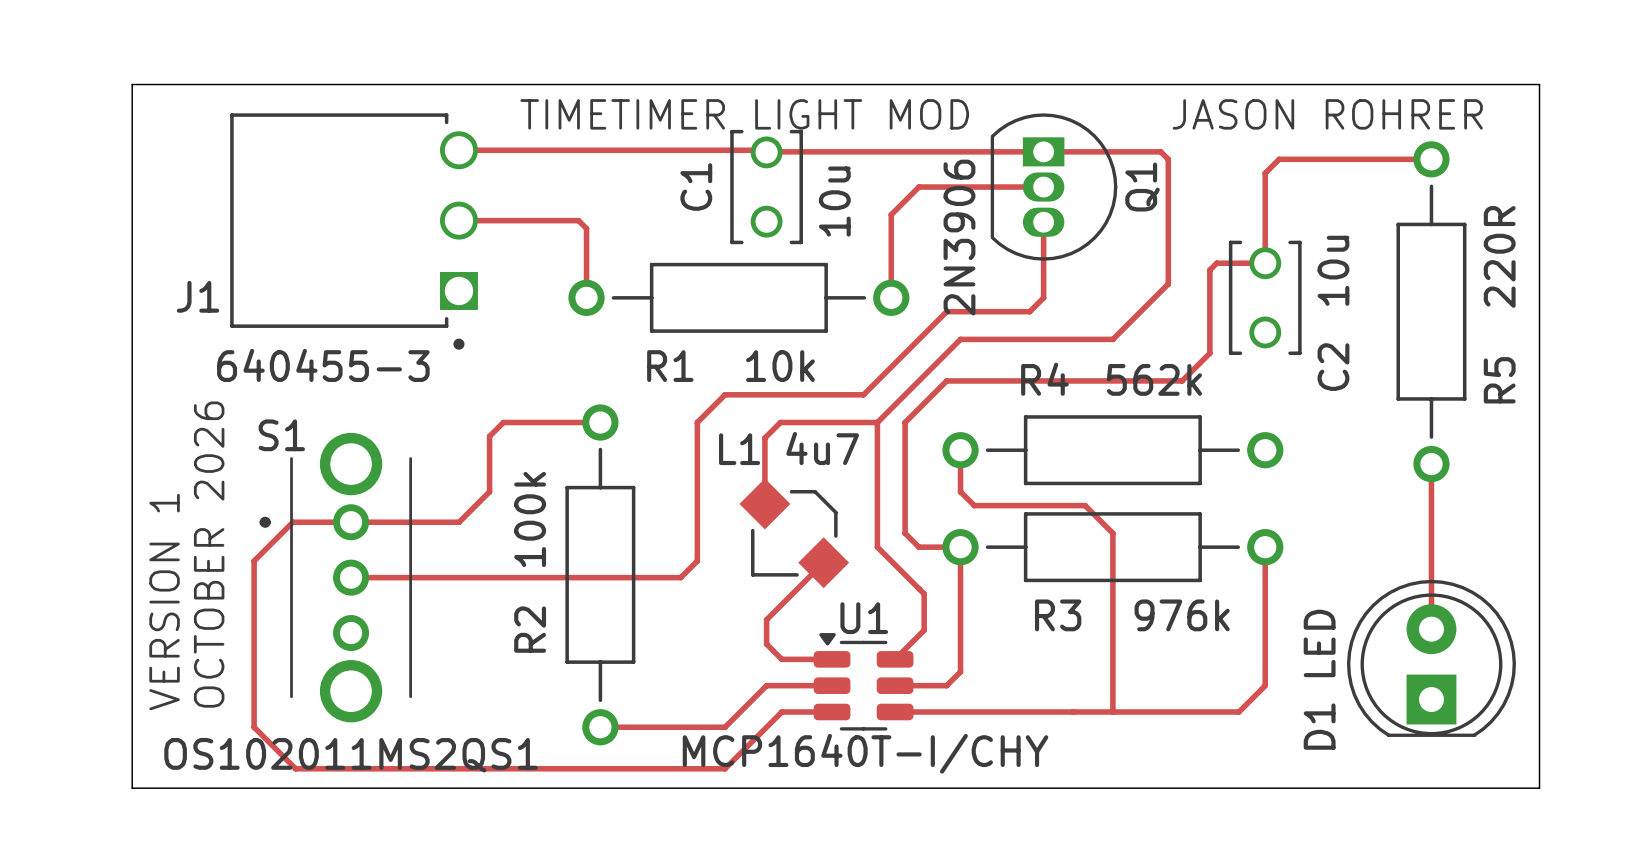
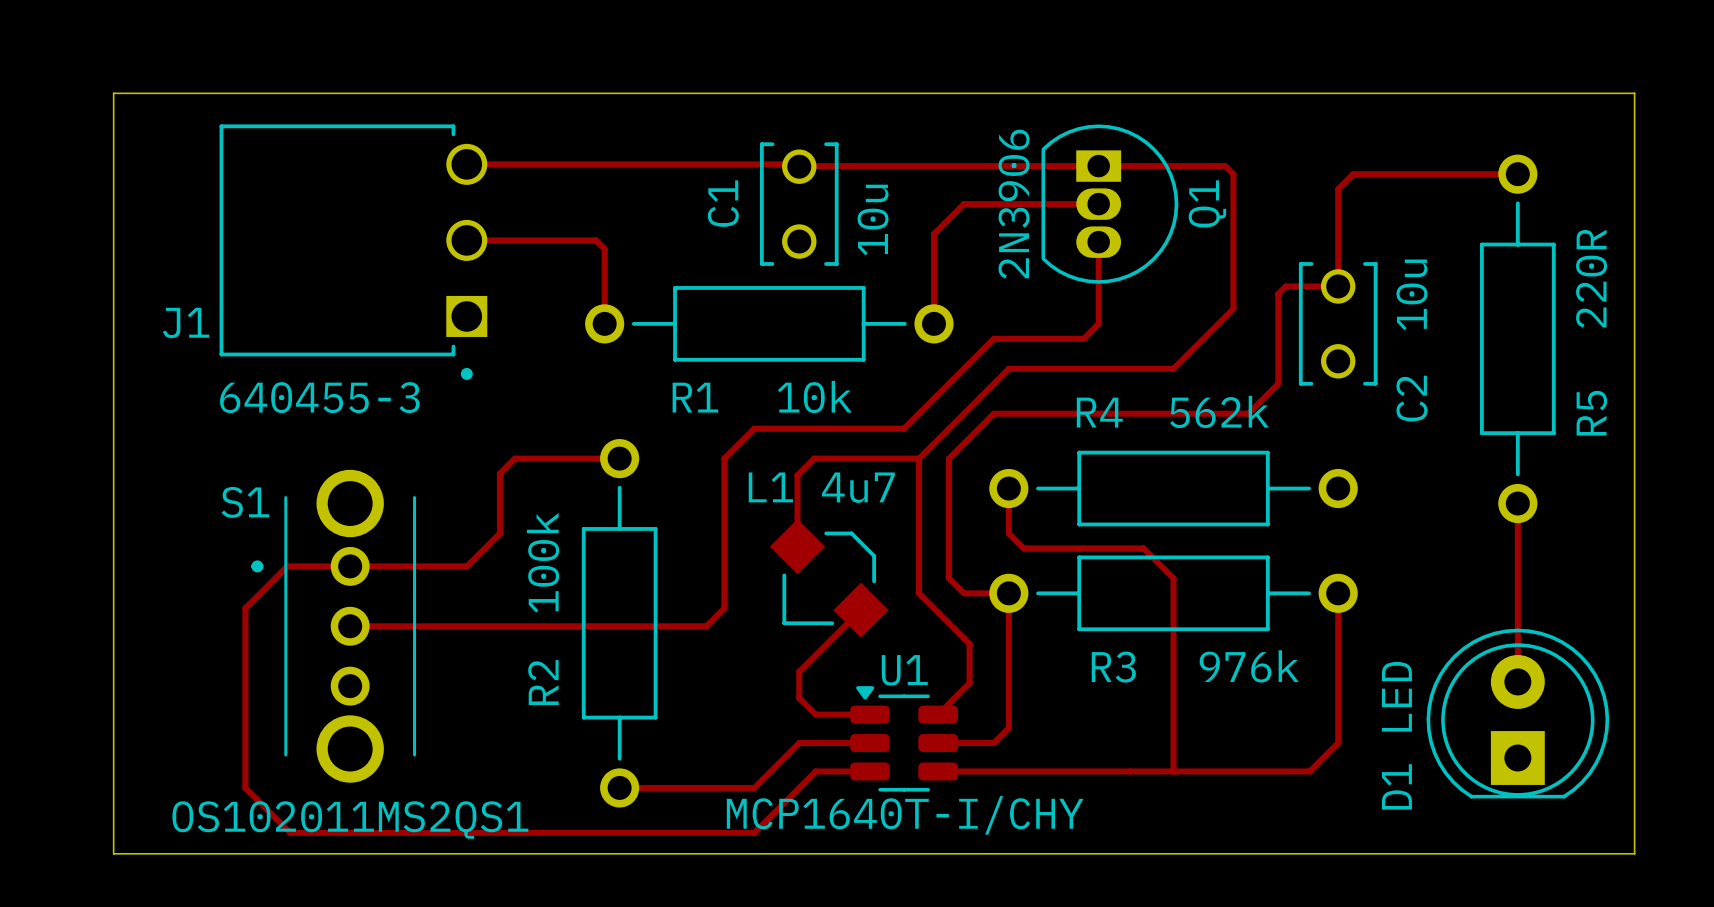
text: TIMETIMER LIGHT MOD (744, 114) -> none
text: JASON ROHRER (1327, 114) -> none
Q1 value position: 2N3906 (959, 237) -> 2N3906 (1014, 204)
S1 name position: S1 (281, 435) -> S1 (245, 502)
text: OCTOBER 2026 (209, 554) -> none
text: VERSION 1 (164, 602) -> none

